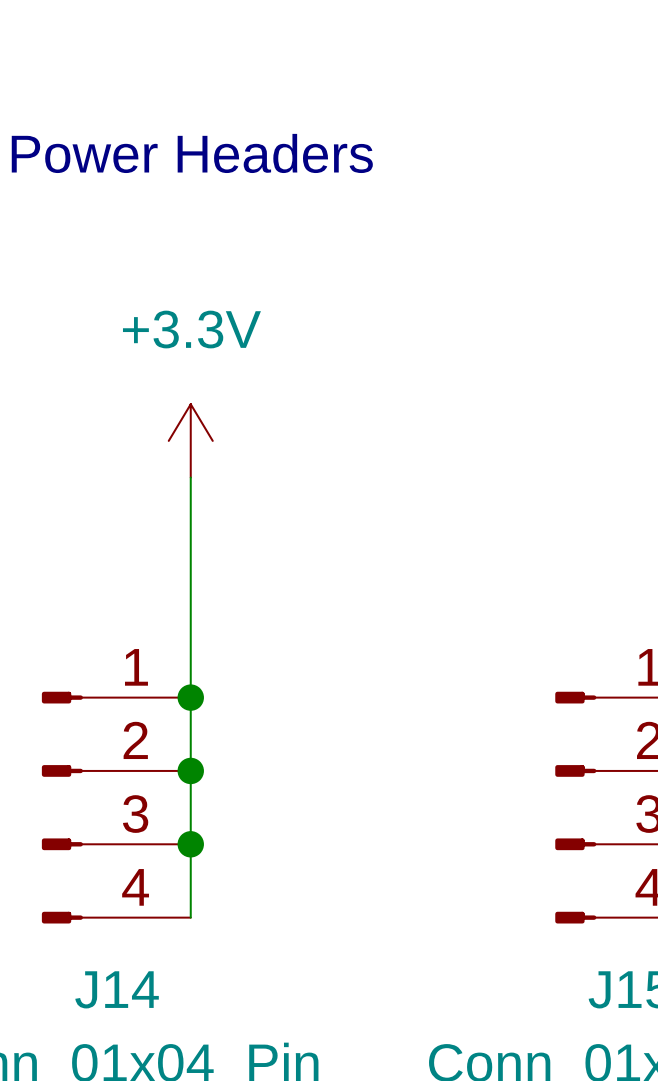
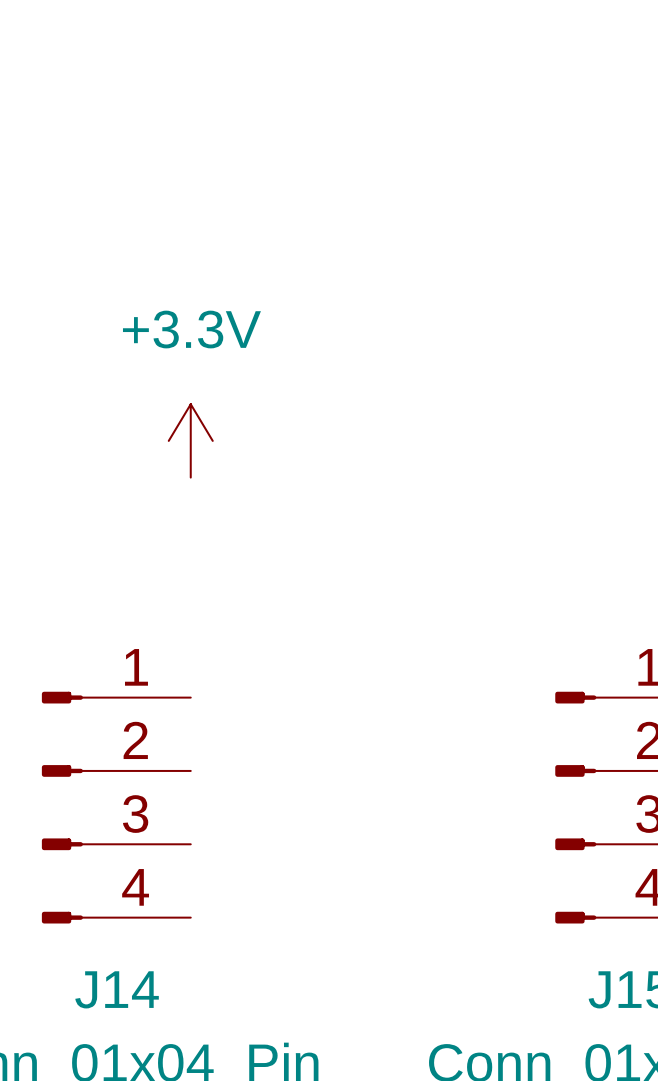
text: Power Headers (192, 153) -> none
wire: (190, 477) (190, 917) -> none
junction: (190, 697) -> none
junction: (190, 770) -> none
junction: (190, 844) -> none

